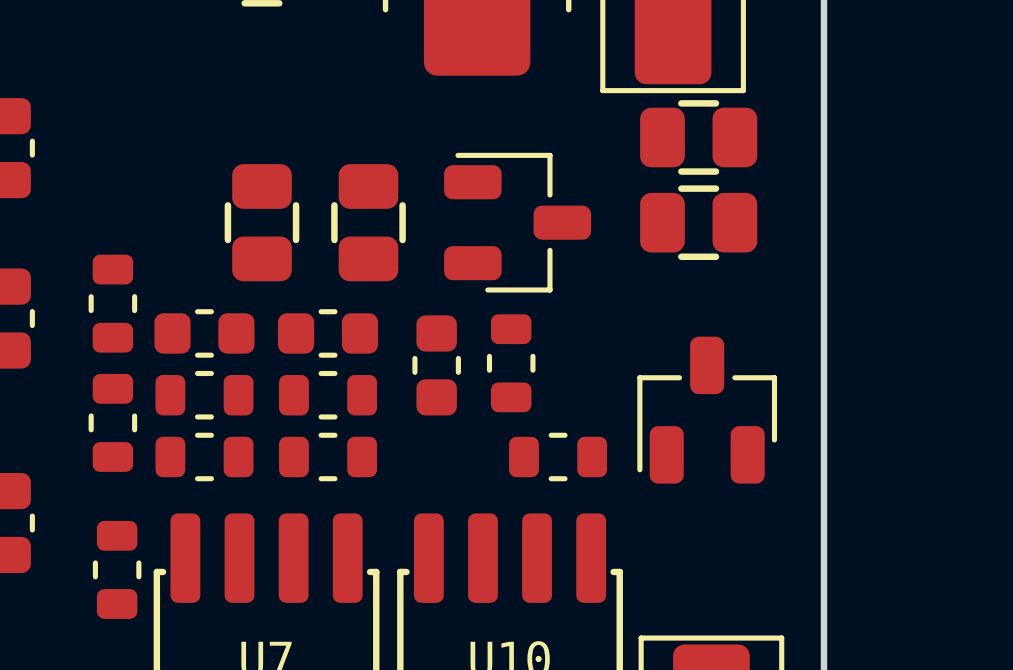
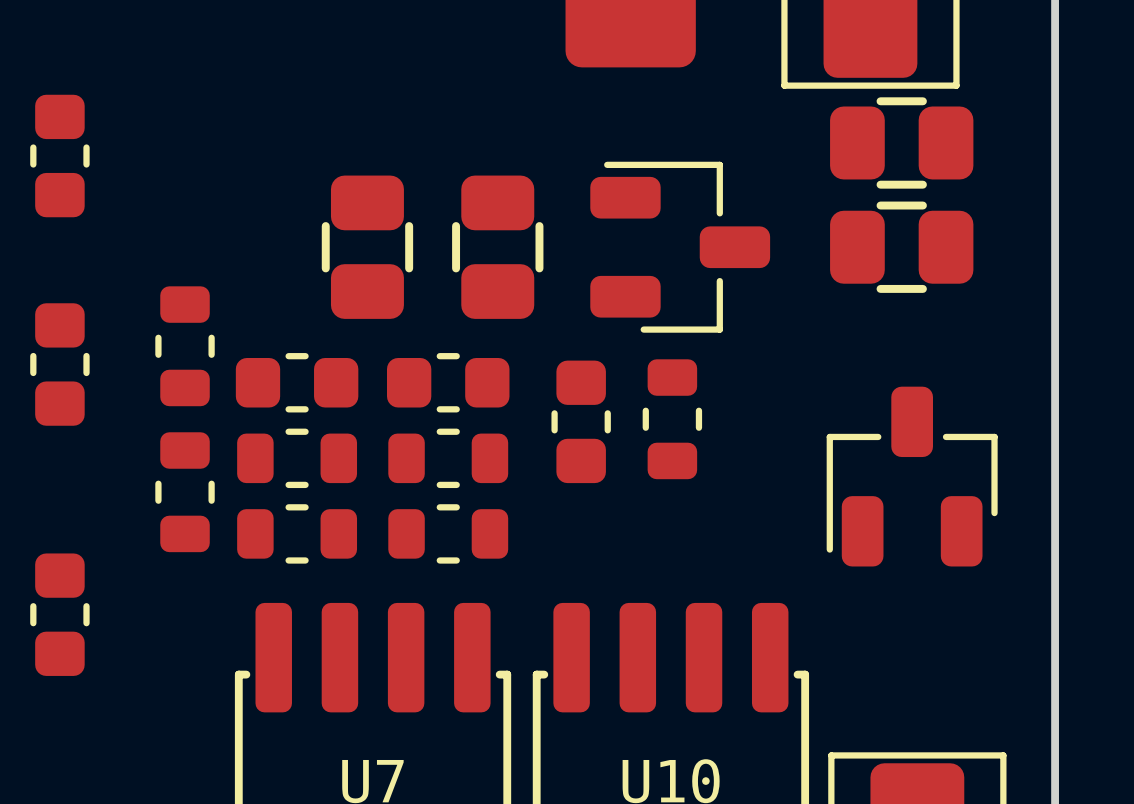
part: (558, 456) -> none
part: (117, 569) -> none

